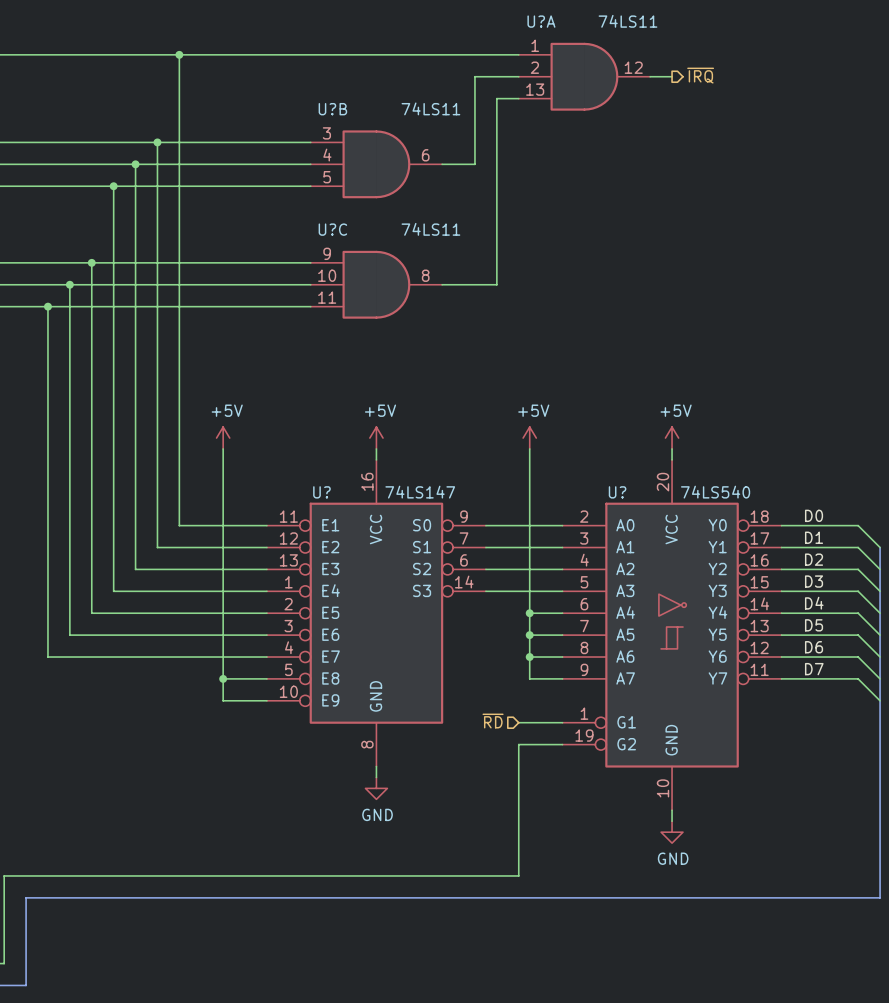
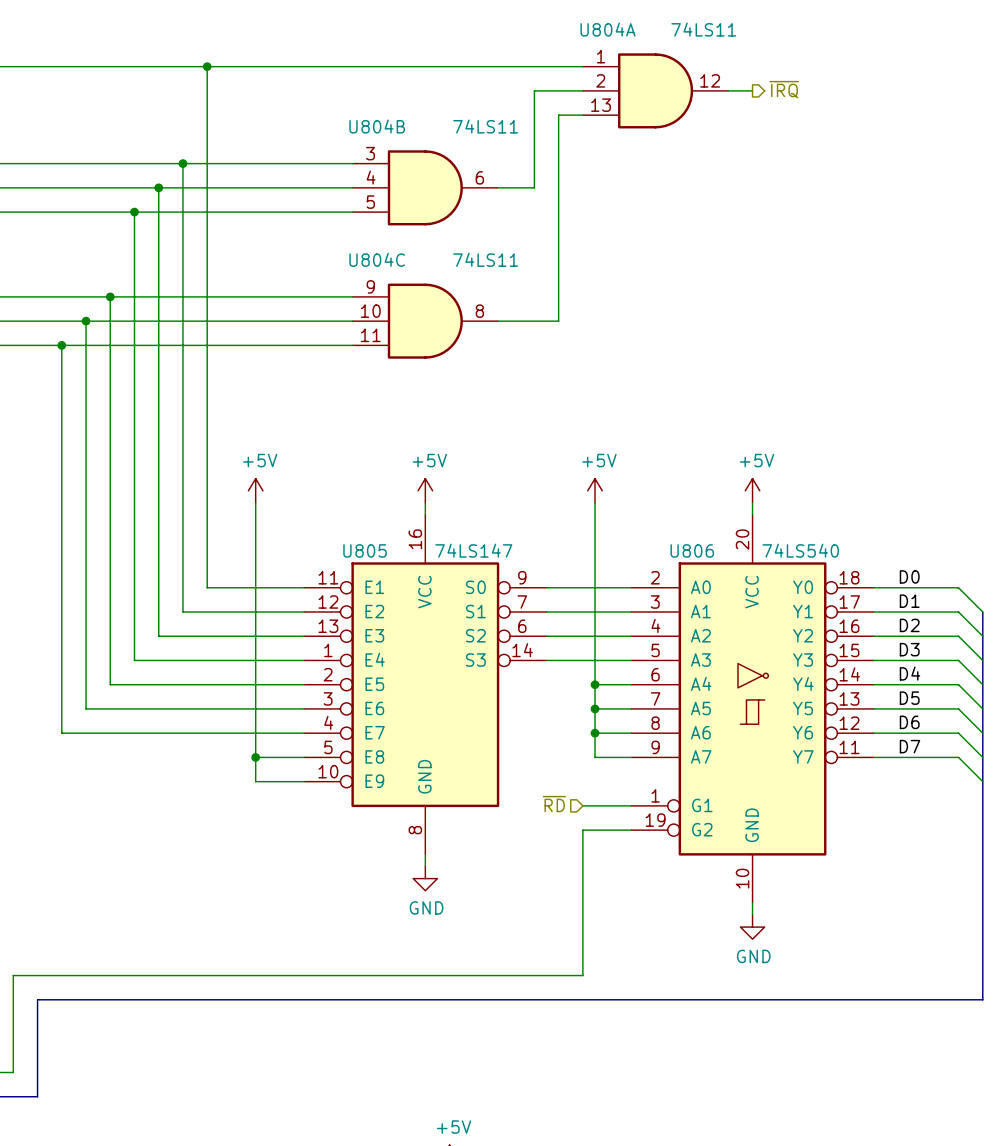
U?A name: U?A (541, 21) -> U804A (607, 29)
U?B name: U?B (332, 109) -> U804B (377, 126)
U?C name: U?C (332, 229) -> U804C (377, 259)
U? name: U? (321, 492) -> U805 (365, 550)
U? name: U? (617, 492) -> U806 (692, 550)

